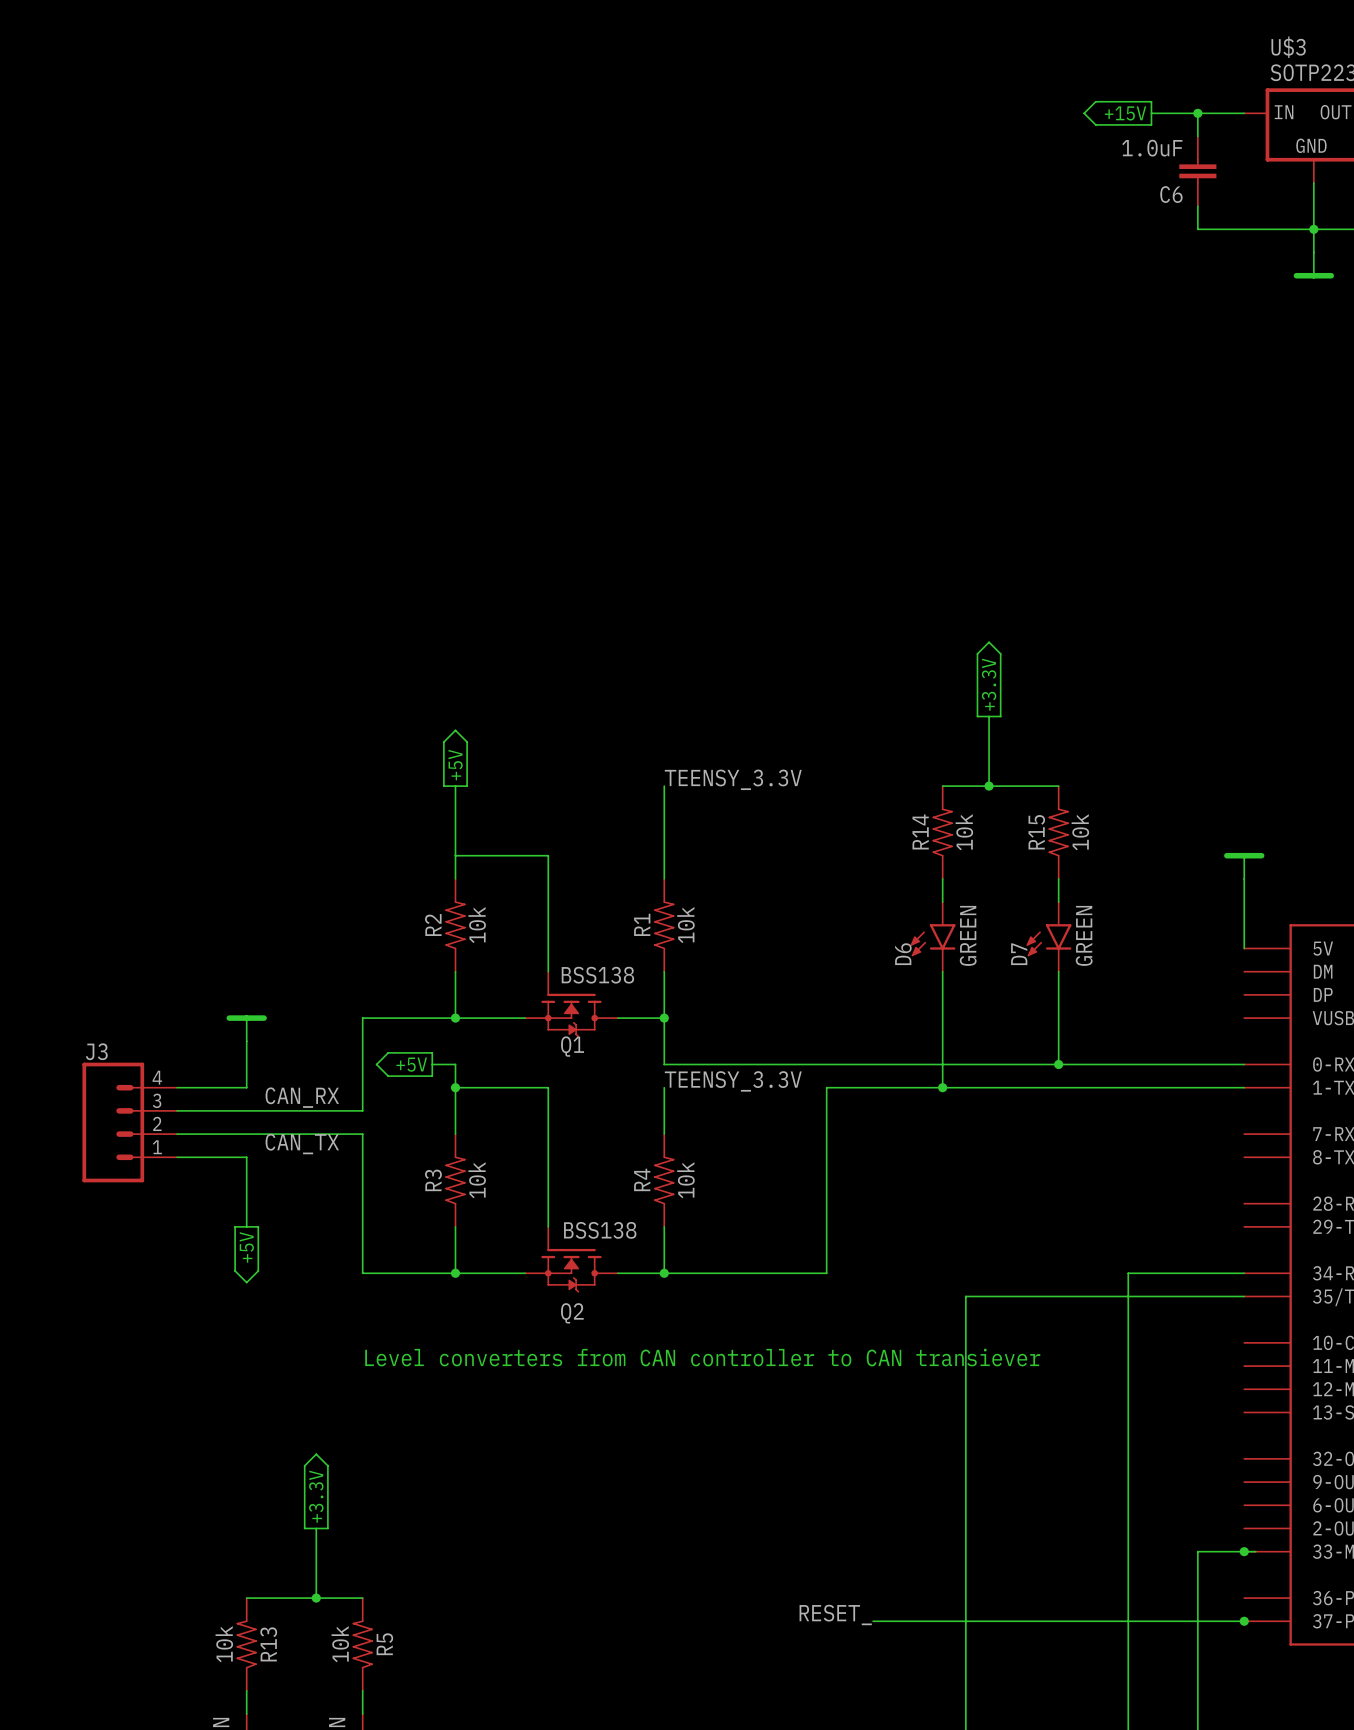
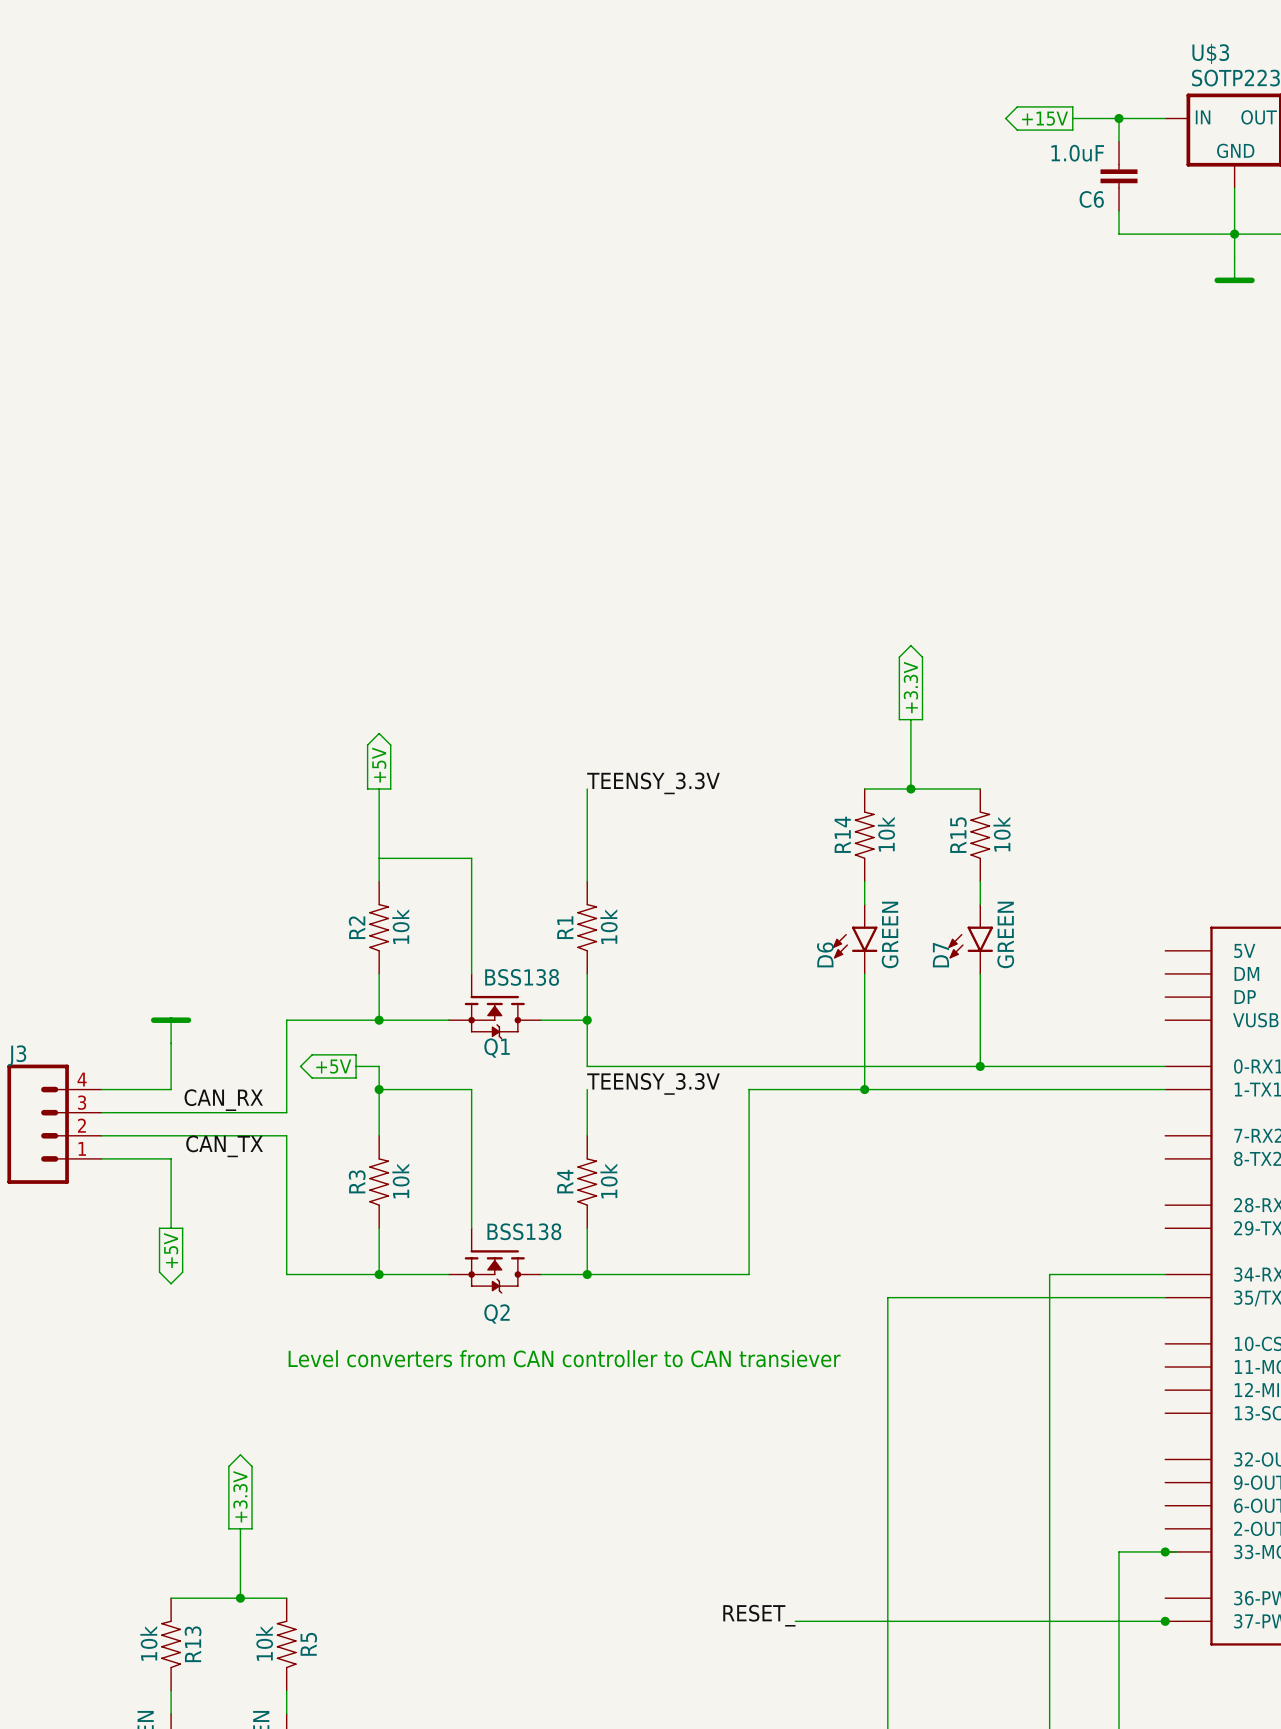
power symbol: (1244, 866) -> none
wire: (1244, 878) (1244, 948) -> none

